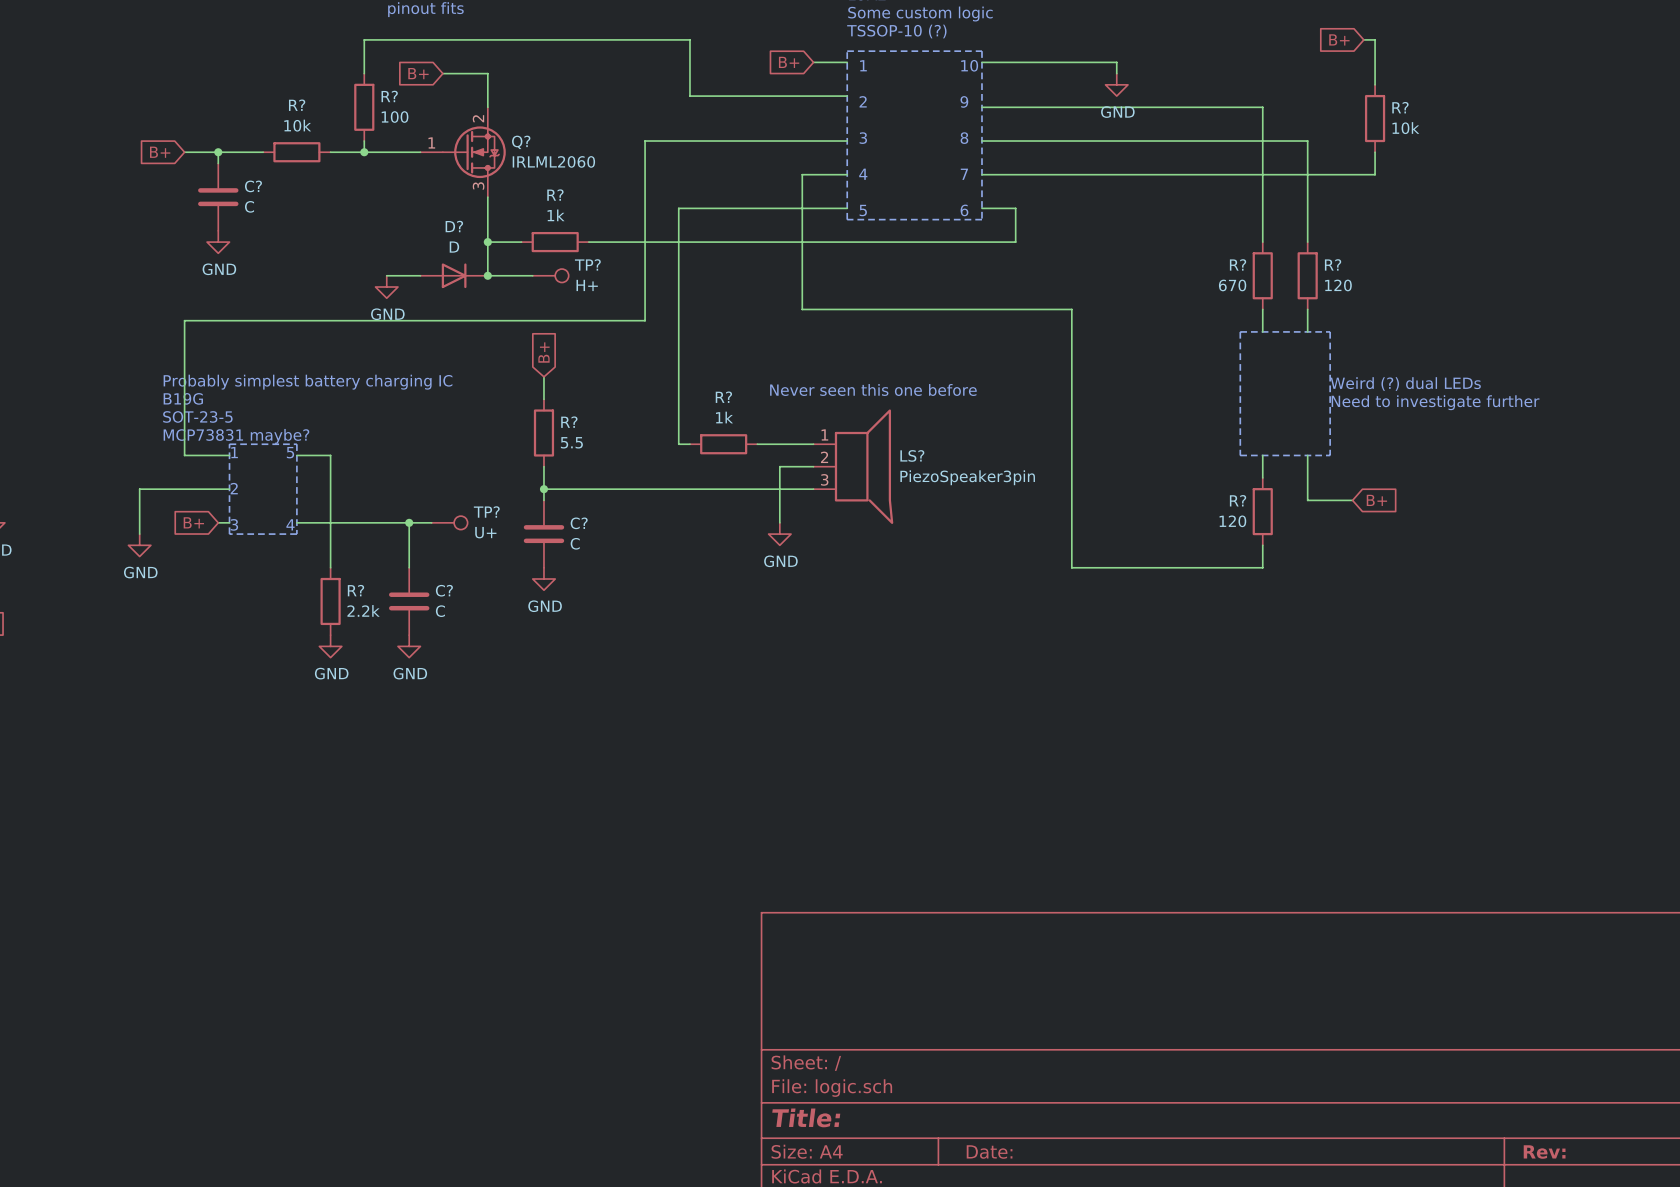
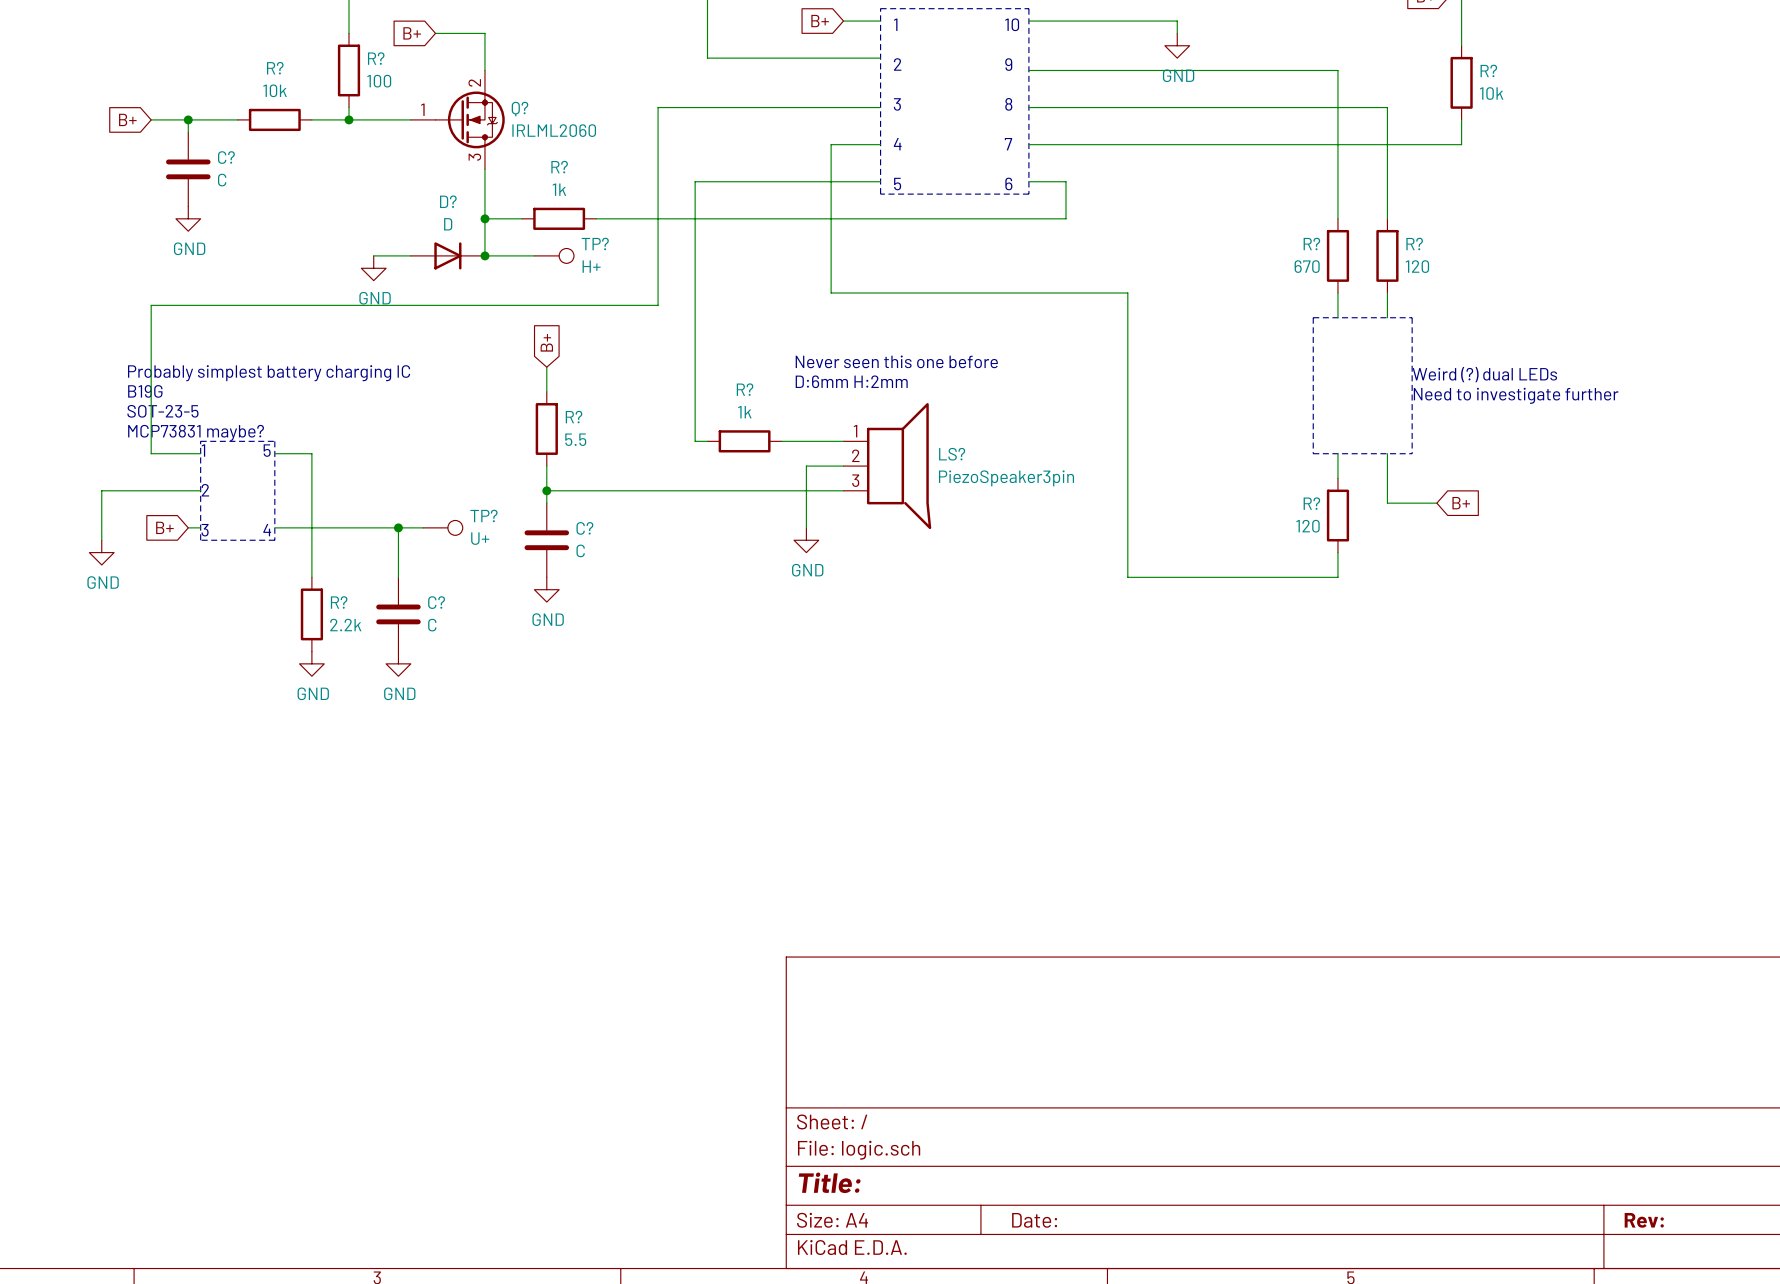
text: none -> Never seen this one before (896, 361)
text: Never seen this one before (873, 389) -> D:6mm H:2mm (851, 381)

